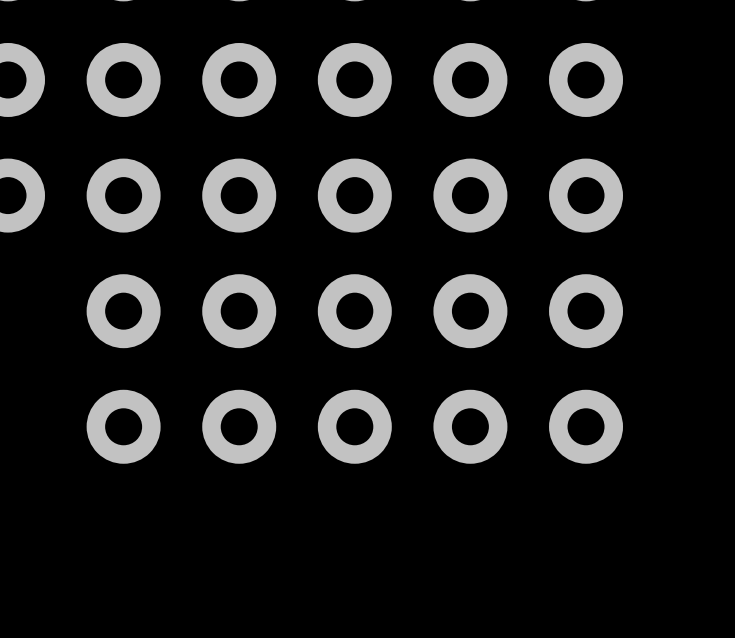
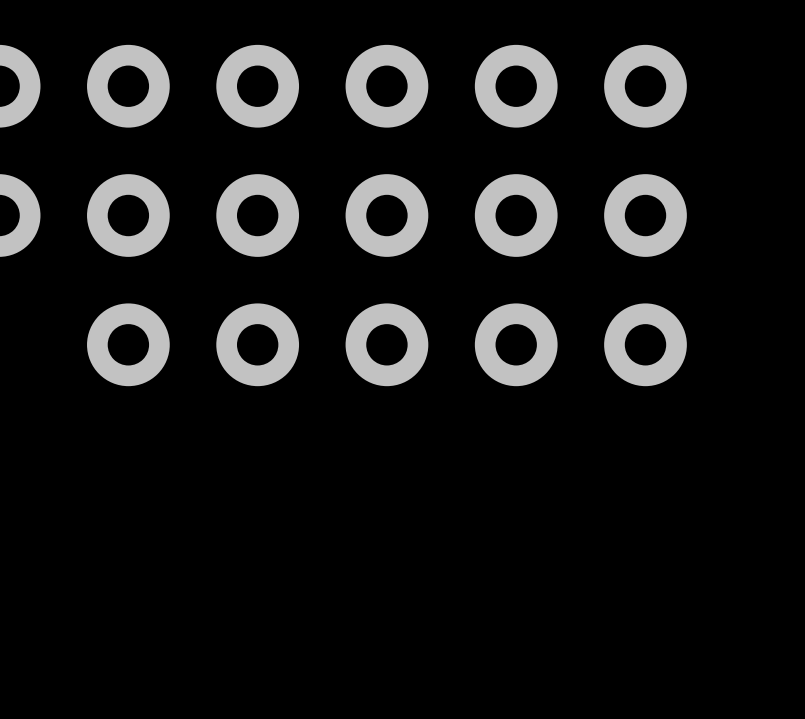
via: (123, 426) -> none
via: (239, 426) -> none
via: (354, 426) -> none
via: (470, 426) -> none
via: (586, 426) -> none

